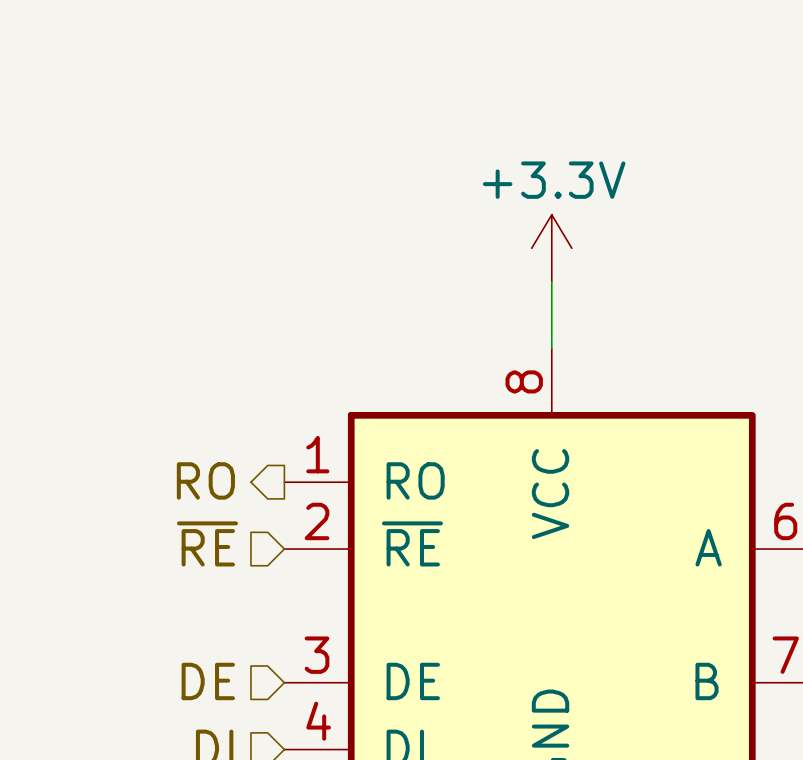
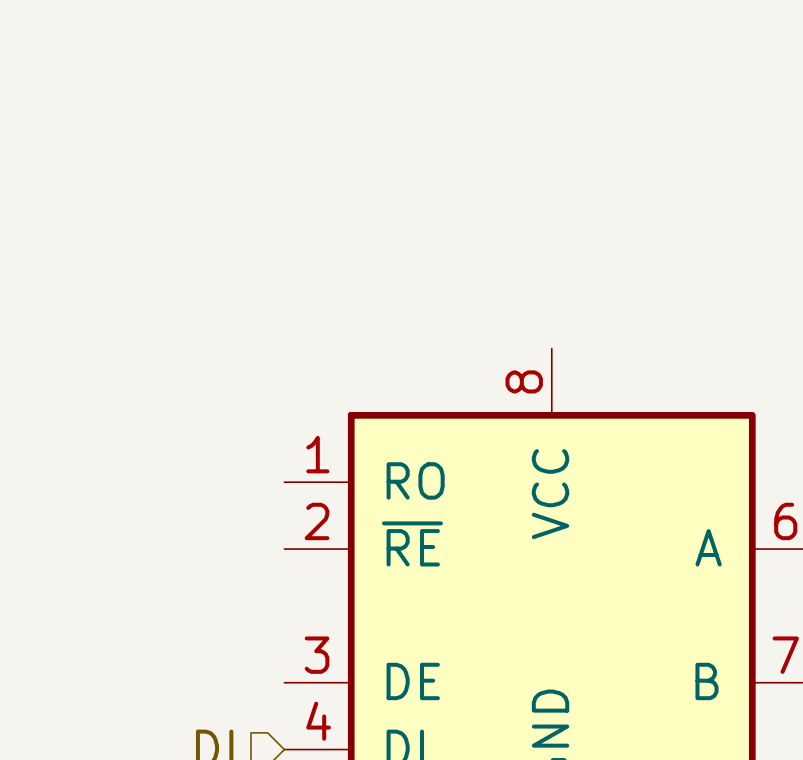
power symbol: +3.3V (551, 248) -> none
wire: (551, 281) (551, 348) -> none
hierarchical label: RO (205, 480) -> none
hierarchical label: ~{RE} (207, 543) -> none
hierarchical label: DE (208, 681) -> none

